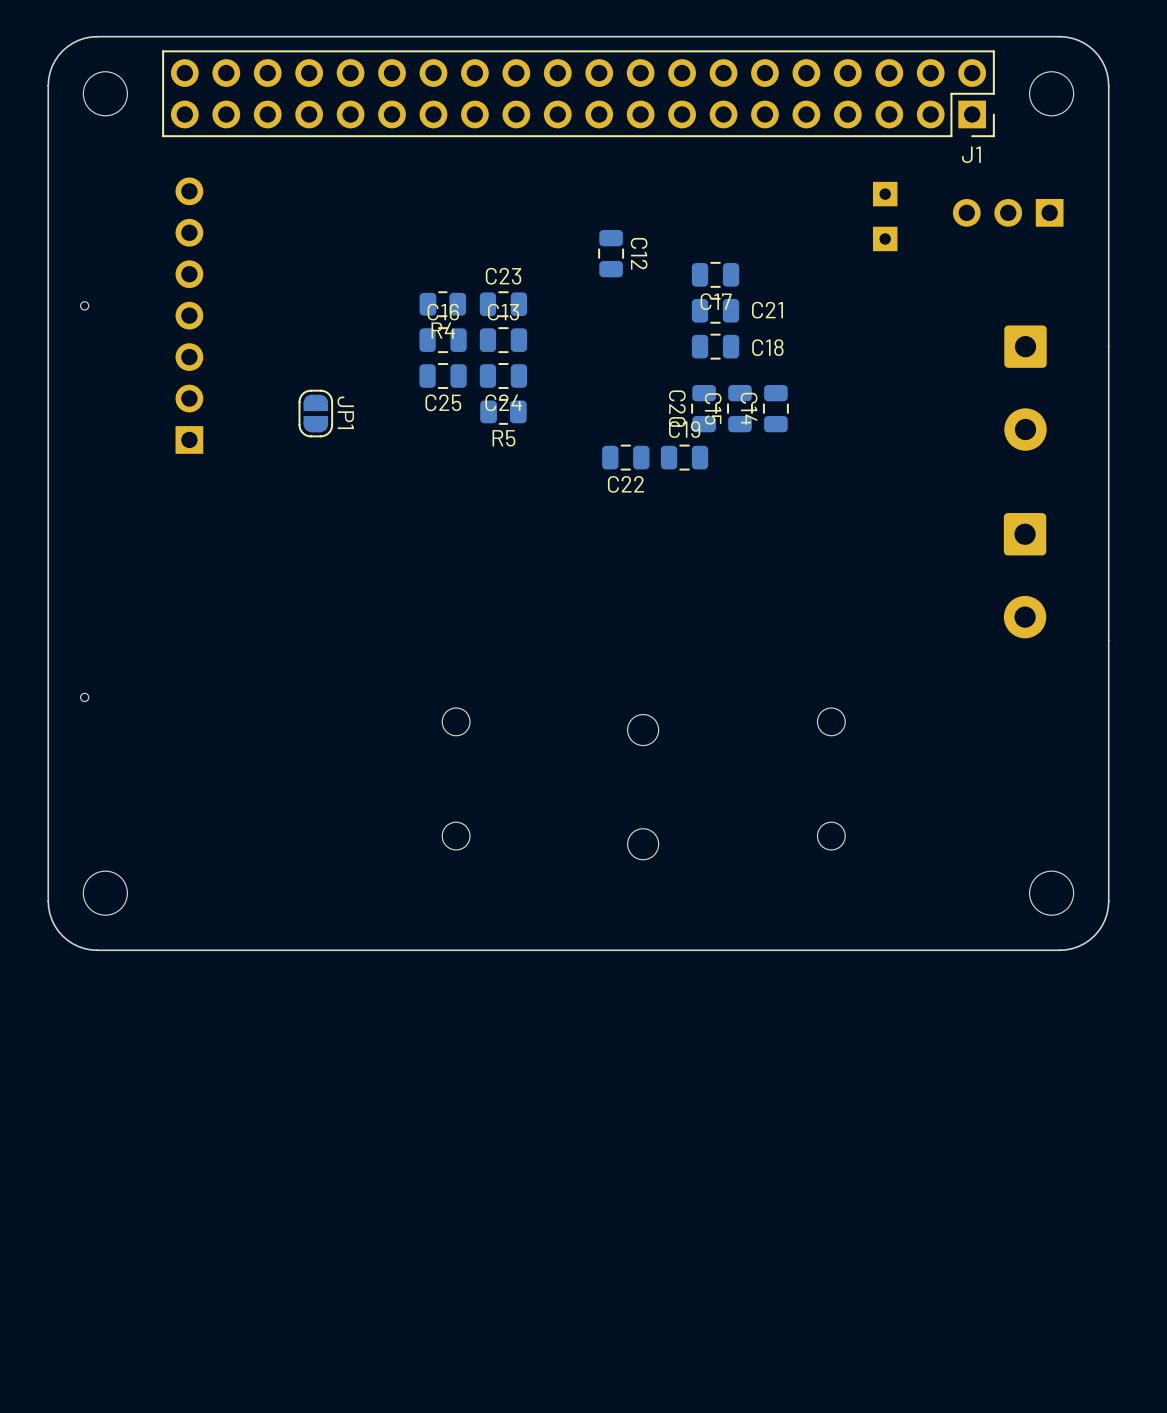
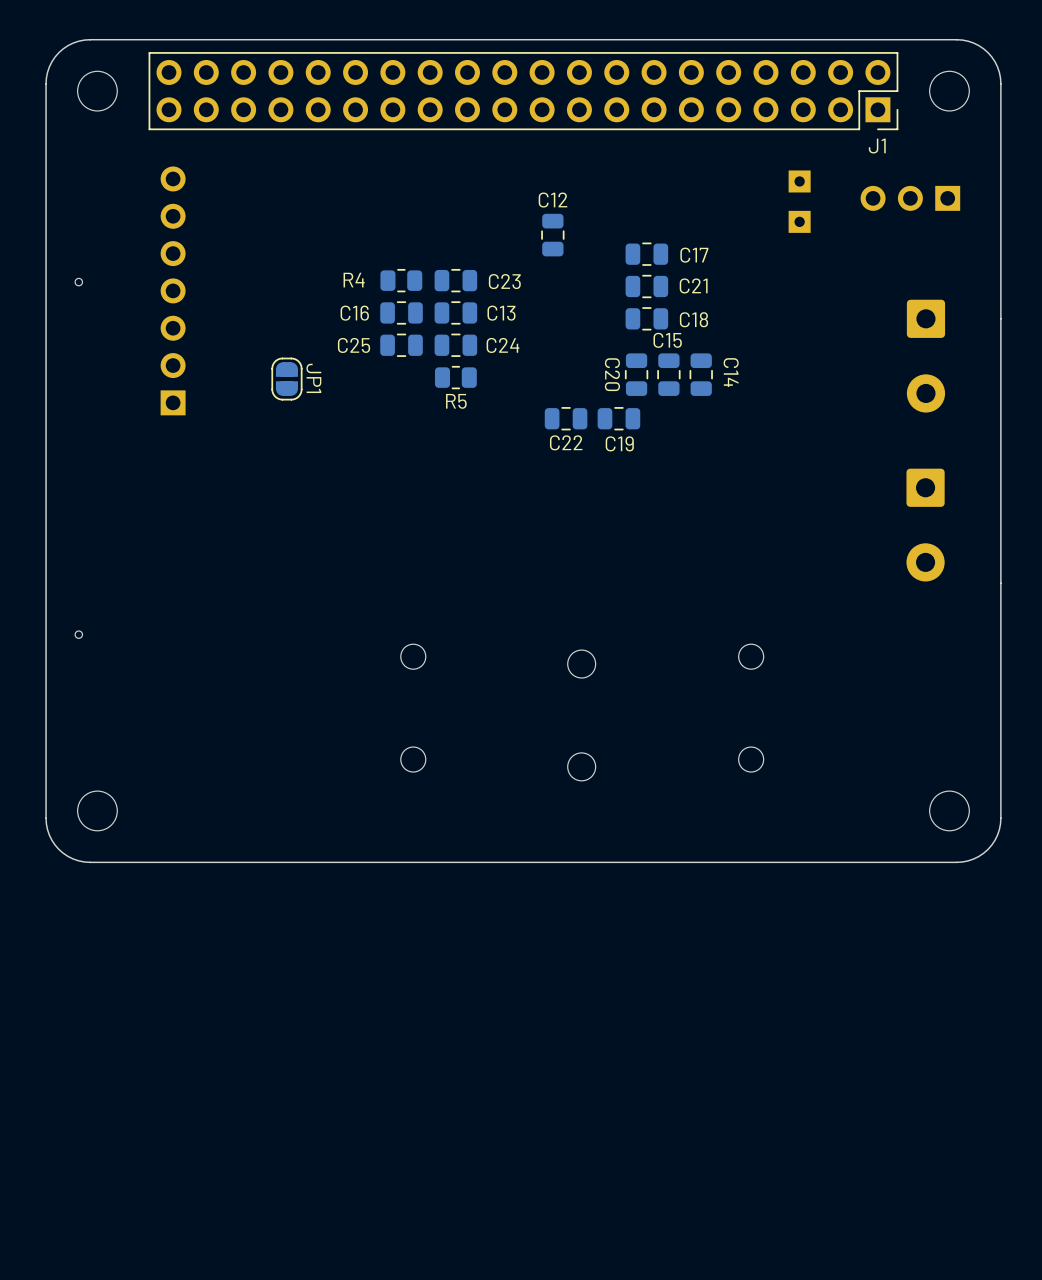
C12 name rotation: 0° (639, 253) -> 90° counterclockwise (552, 200)
C23 name position: C23 (503, 276) -> C23 (504, 281)
C17 name position: C17 (716, 301) -> C17 (694, 255)
C16 name position: C16 (443, 312) -> C16 (354, 313)
C13 name position: C13 (503, 312) -> C13 (501, 313)
R4 name position: R4 (443, 330) -> R4 (354, 280)
C25 name position: C25 (443, 402) -> C25 (354, 345)
C24 name position: C24 (503, 402) -> C24 (503, 345)
C15 name rotation: 0° (713, 408) -> 90° counterclockwise (667, 340)
C14 name position: C14 (749, 408) -> C14 (731, 372)
C19 name position: C19 (684, 429) -> C19 (619, 443)

